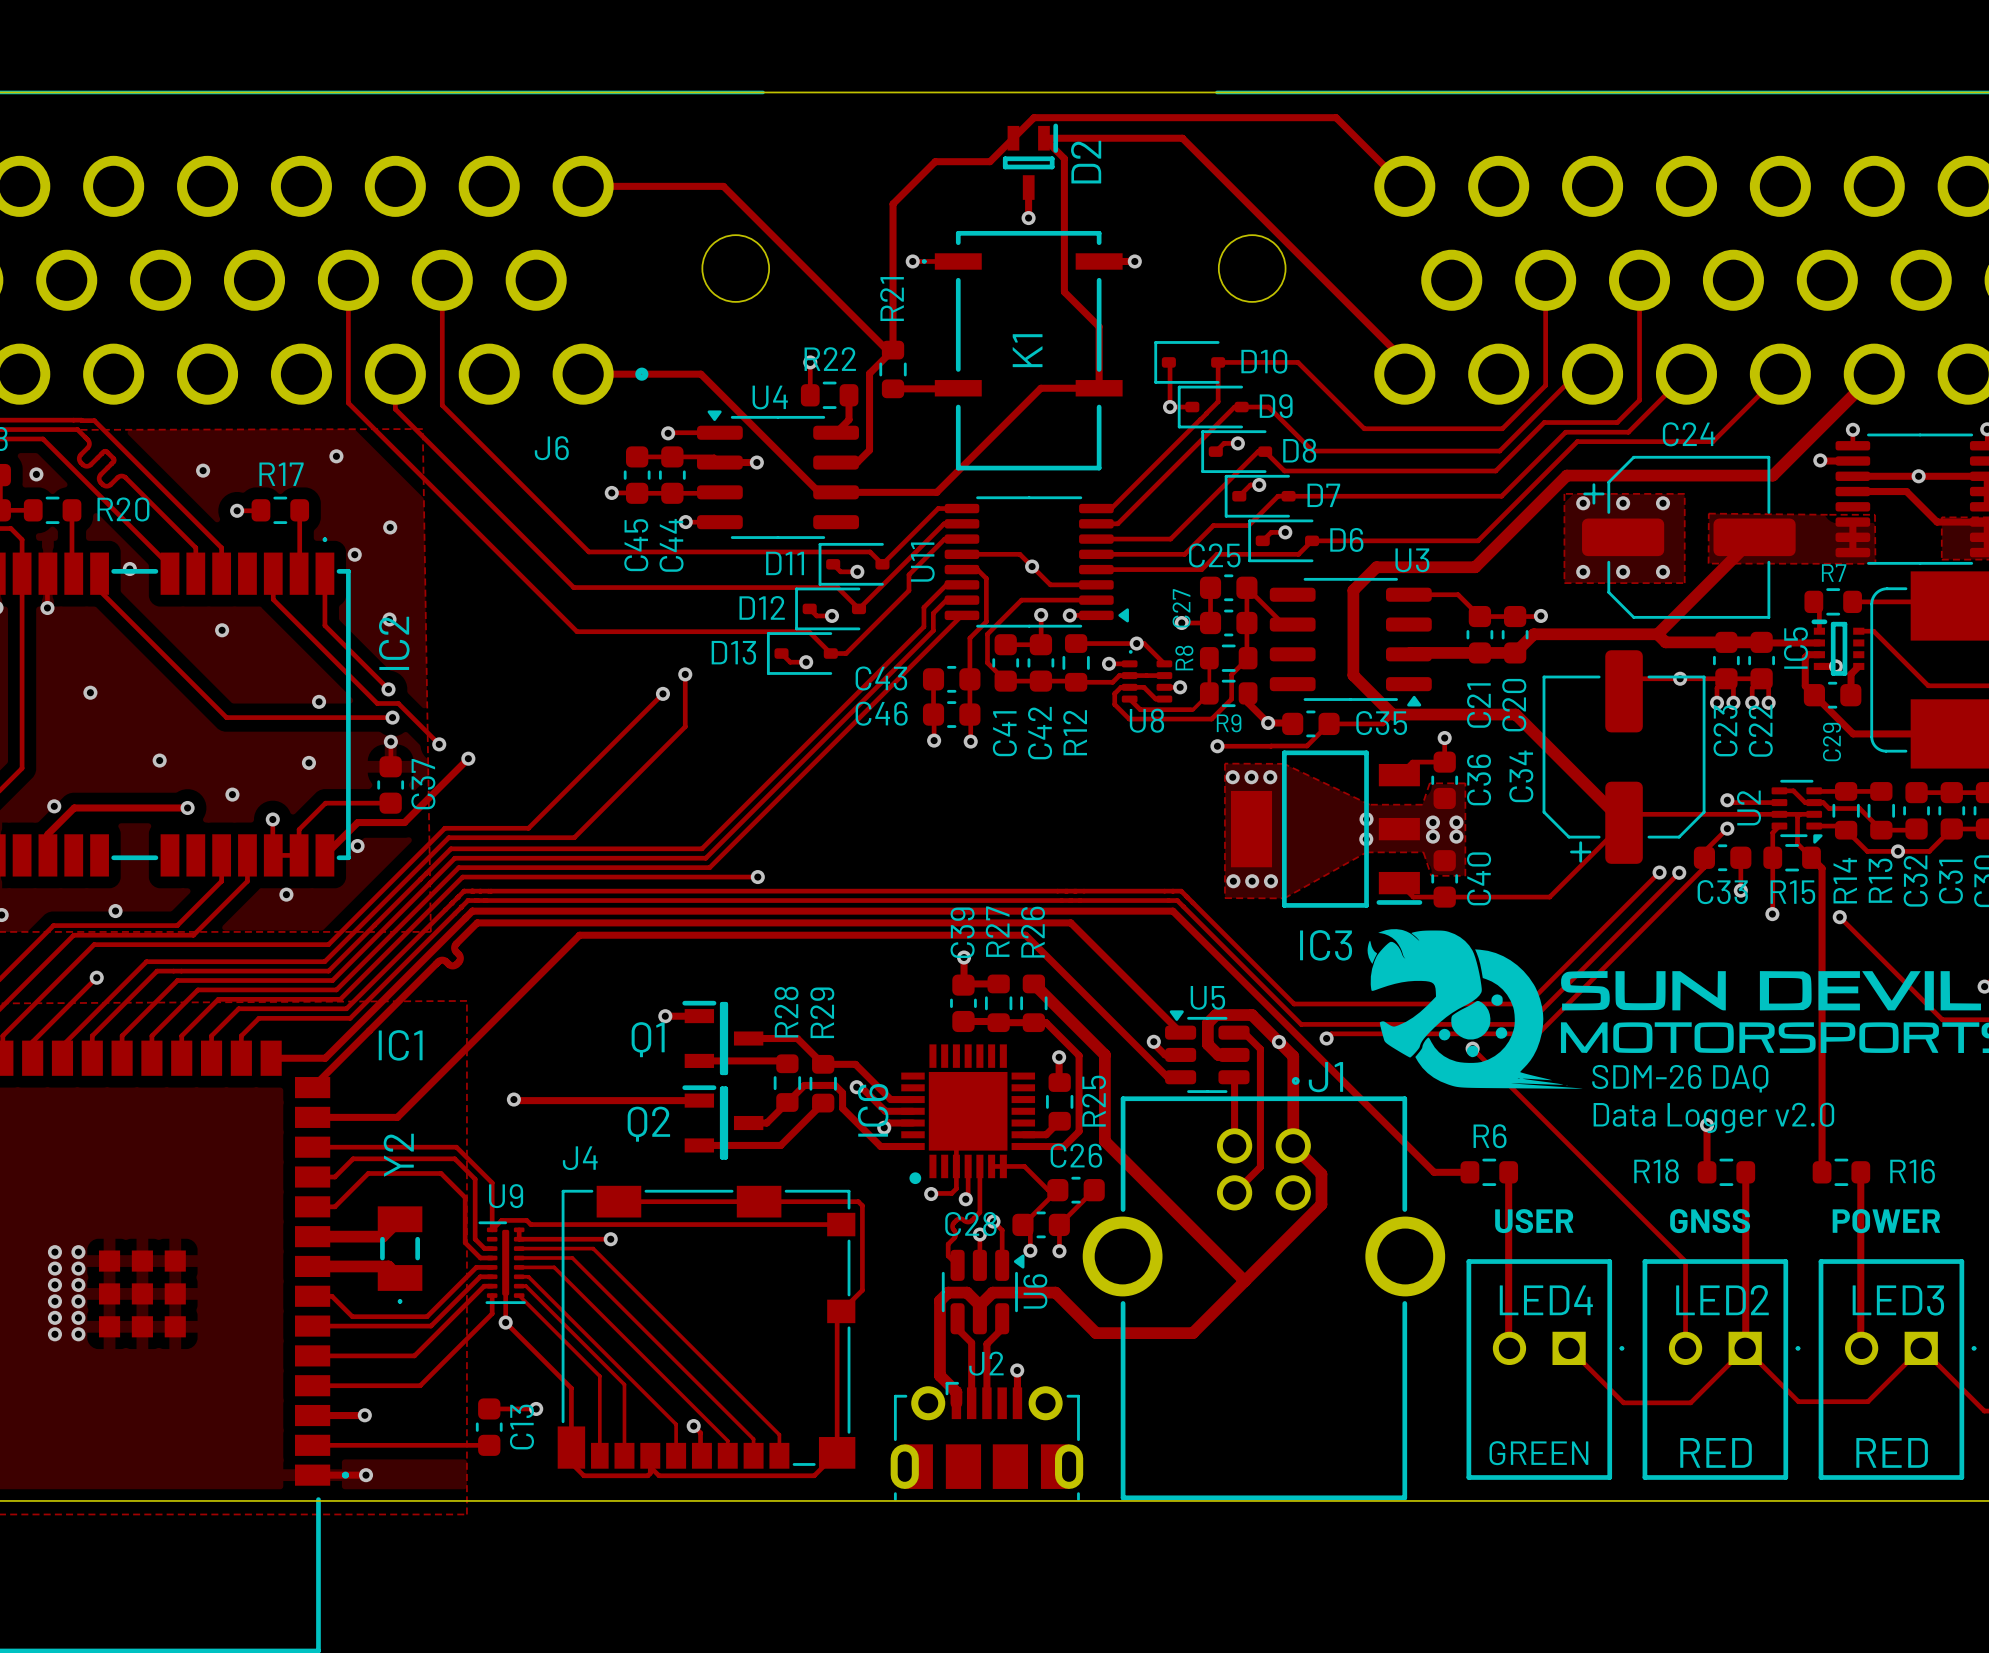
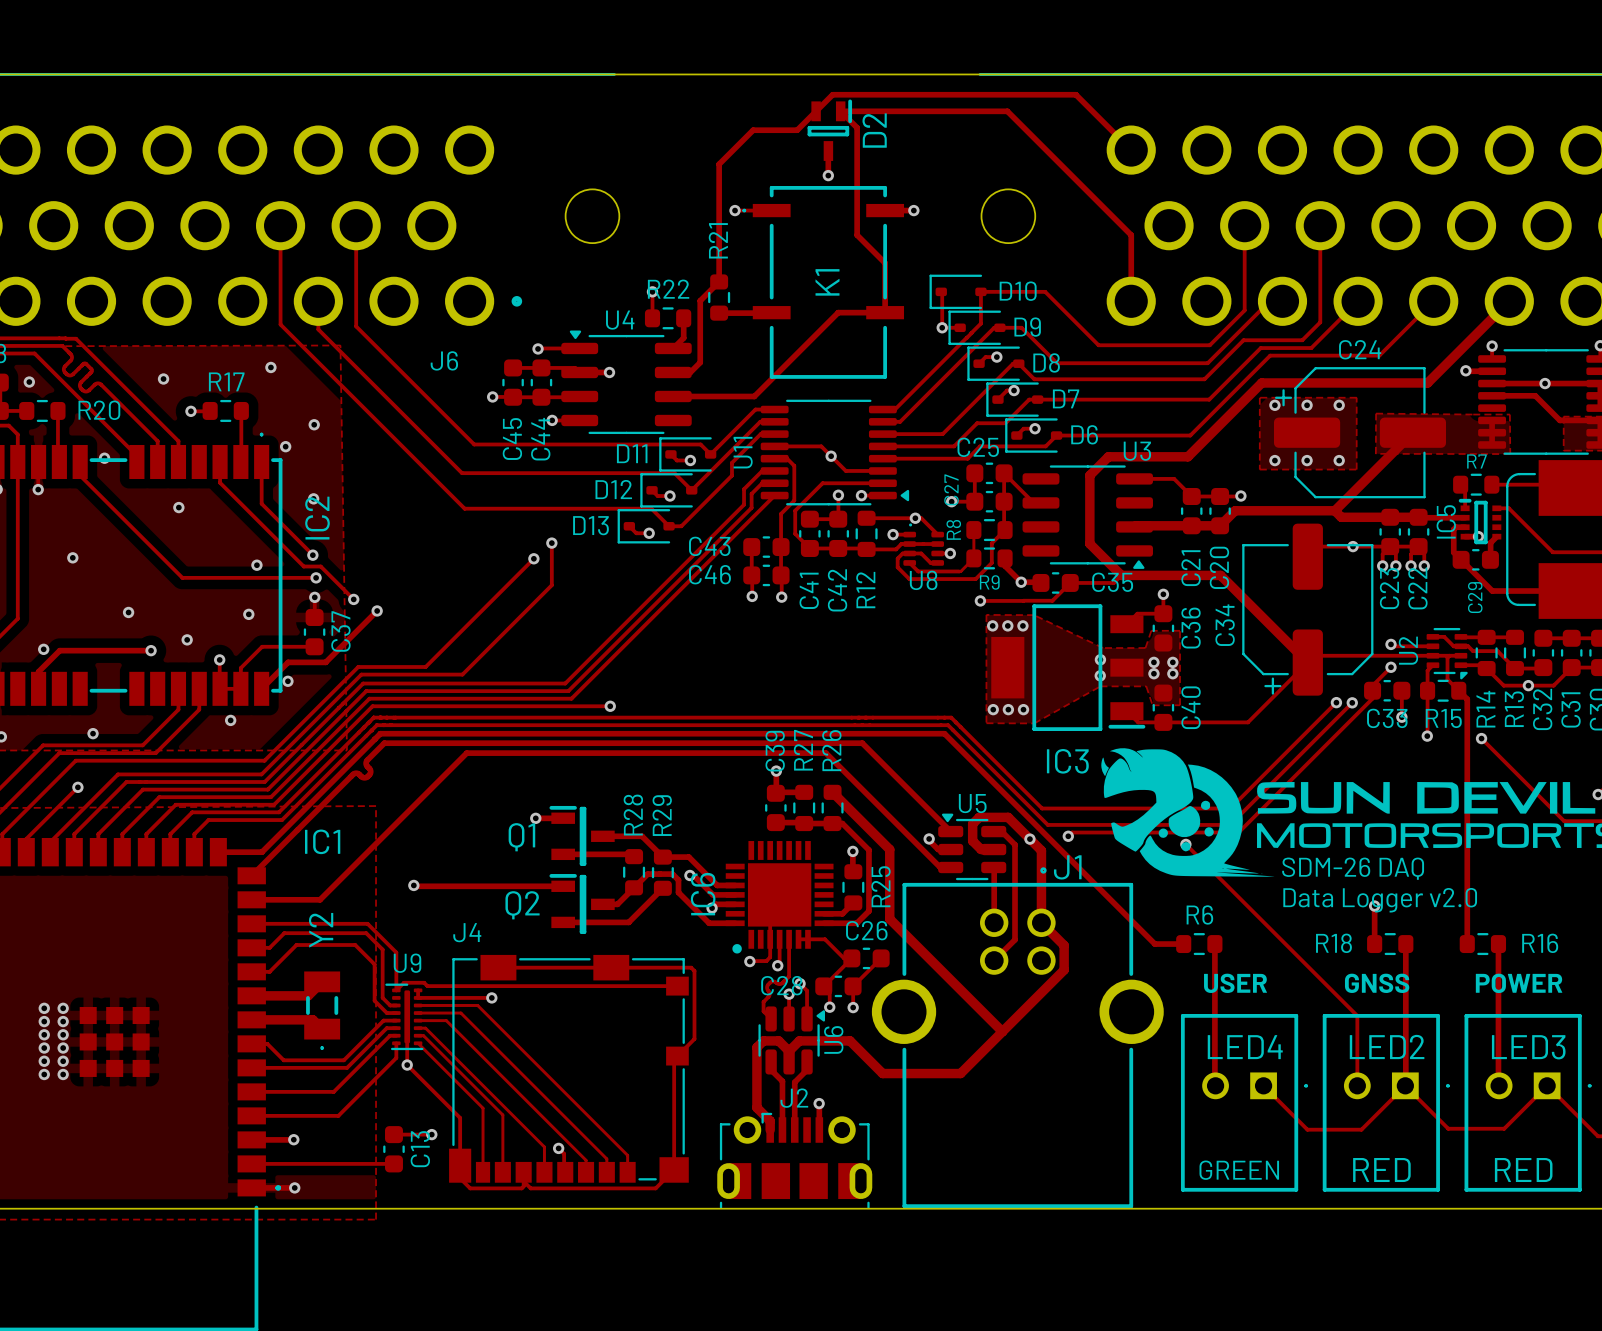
track: (1182, 138) (1404, 360) -> (952, 111) (1007, 111) (1131, 235) (1131, 290)
track: (583, 186) (723, 186) (887, 350) -> none
track: (583, 374) (700, 374) (819, 492) -> none

